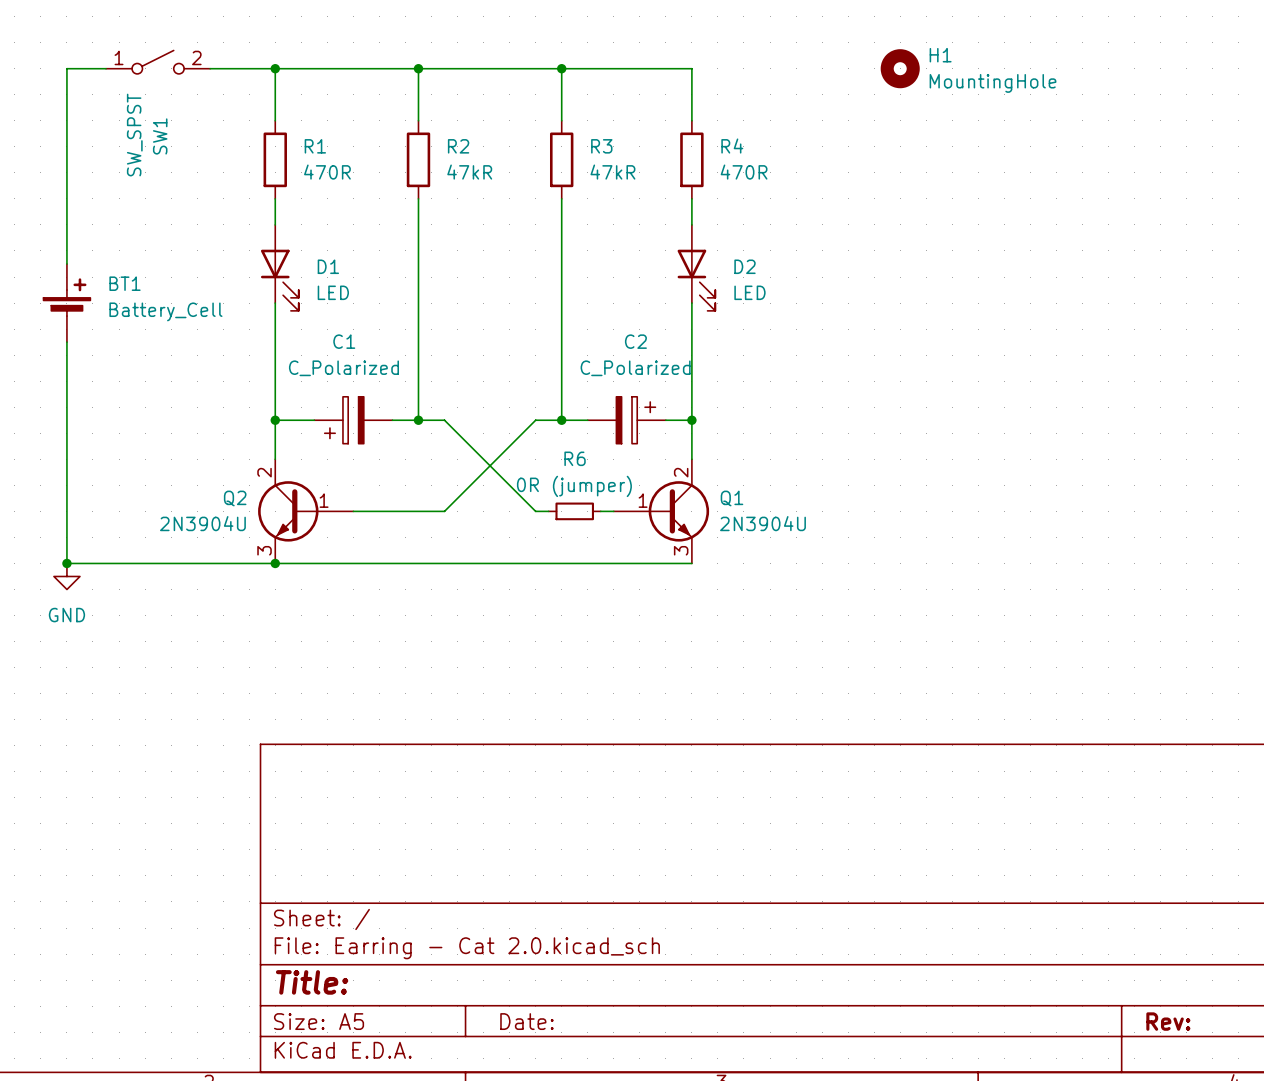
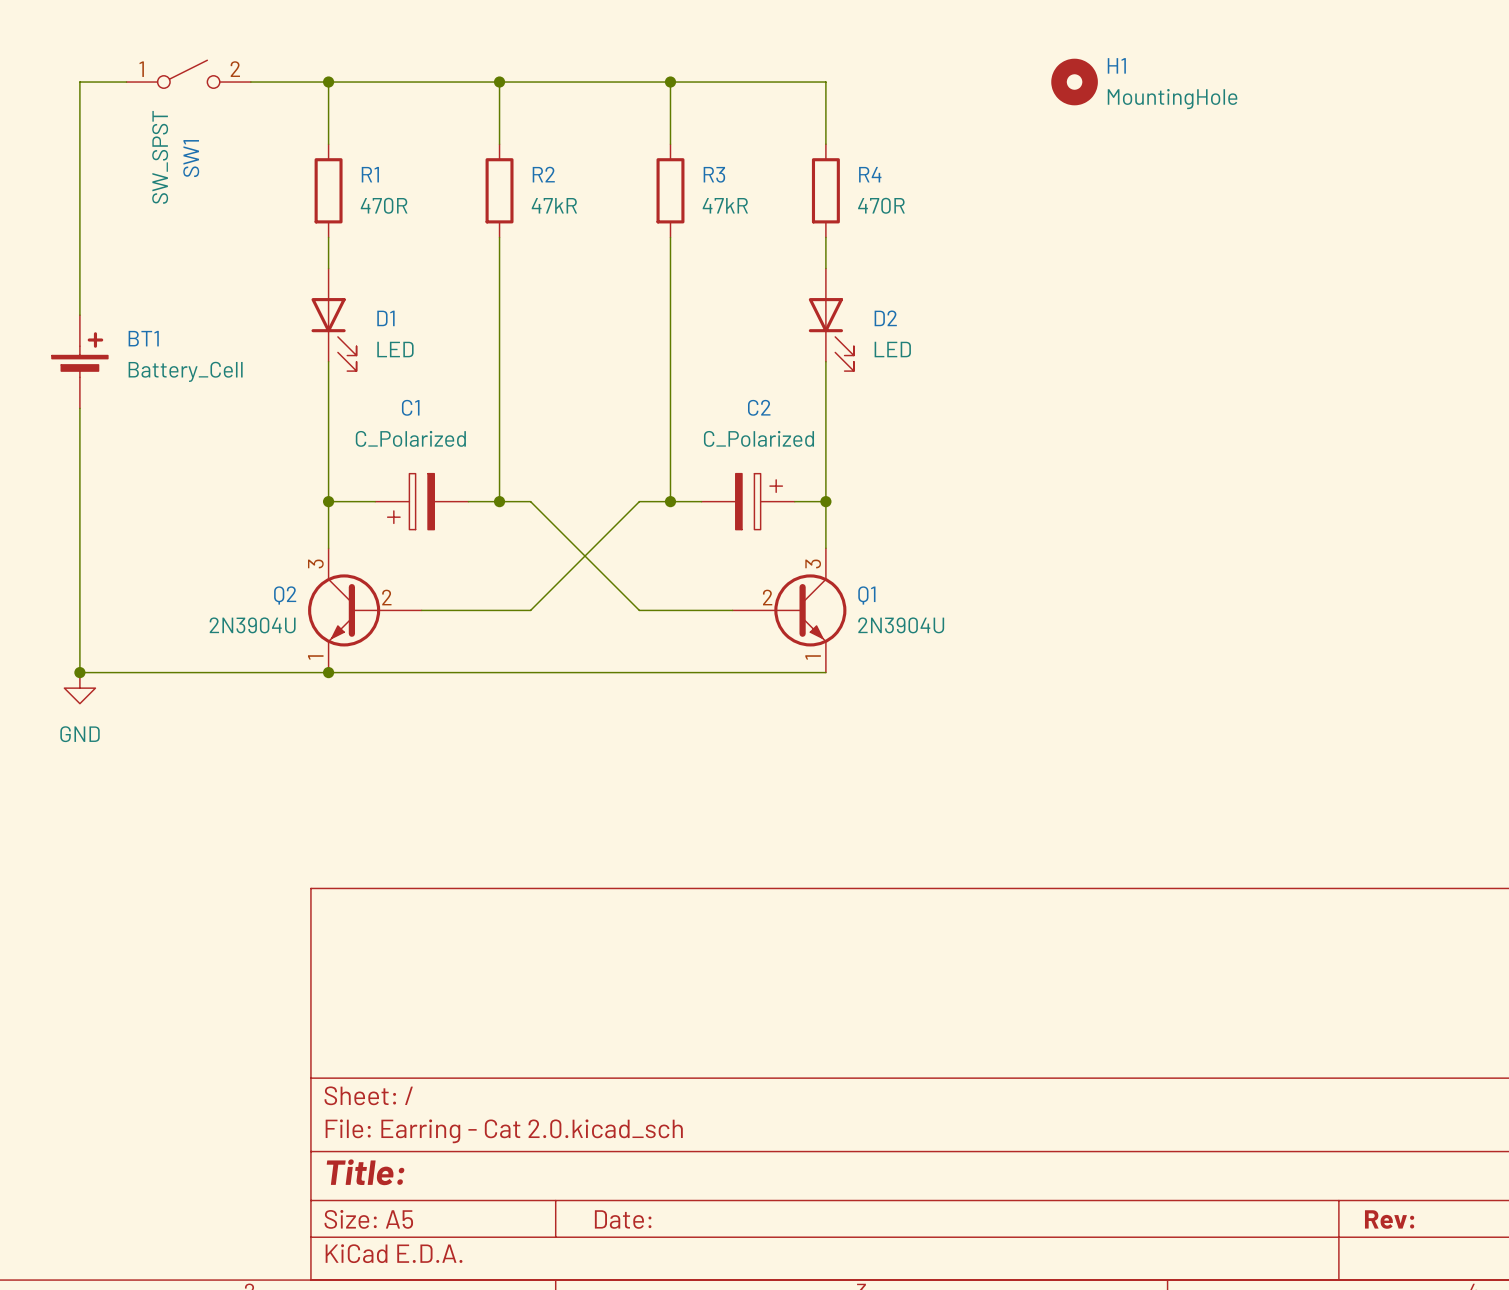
Q2 pin number: 2 (264, 472) -> 3 (315, 563)
Q1 pin number: 2 (681, 472) -> 3 (813, 563)
Q2 pin number: 1 (324, 500) -> 2 (386, 597)
Q1 pin number: 1 (643, 500) -> 2 (767, 597)
wire: none -> (654, 610) (717, 610)
R6: 0R (jumper) (574, 511) -> none
Q2 pin number: 3 (264, 550) -> 1 (315, 657)
Q1 pin number: 3 (681, 550) -> 1 (813, 657)

